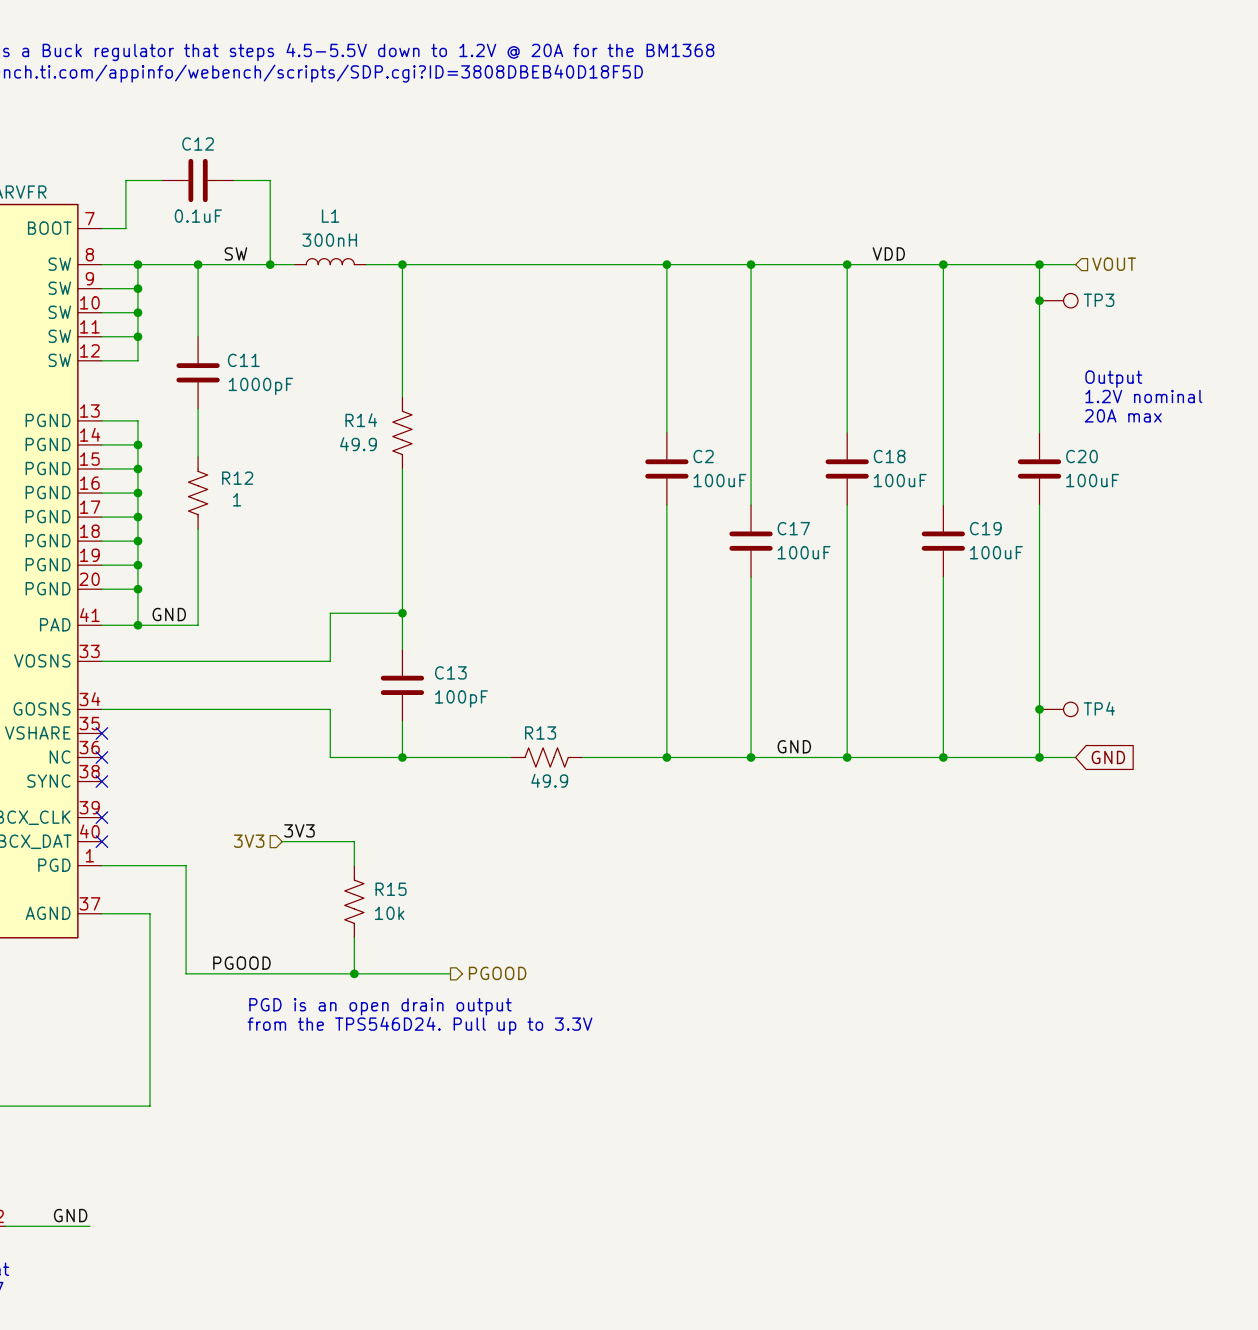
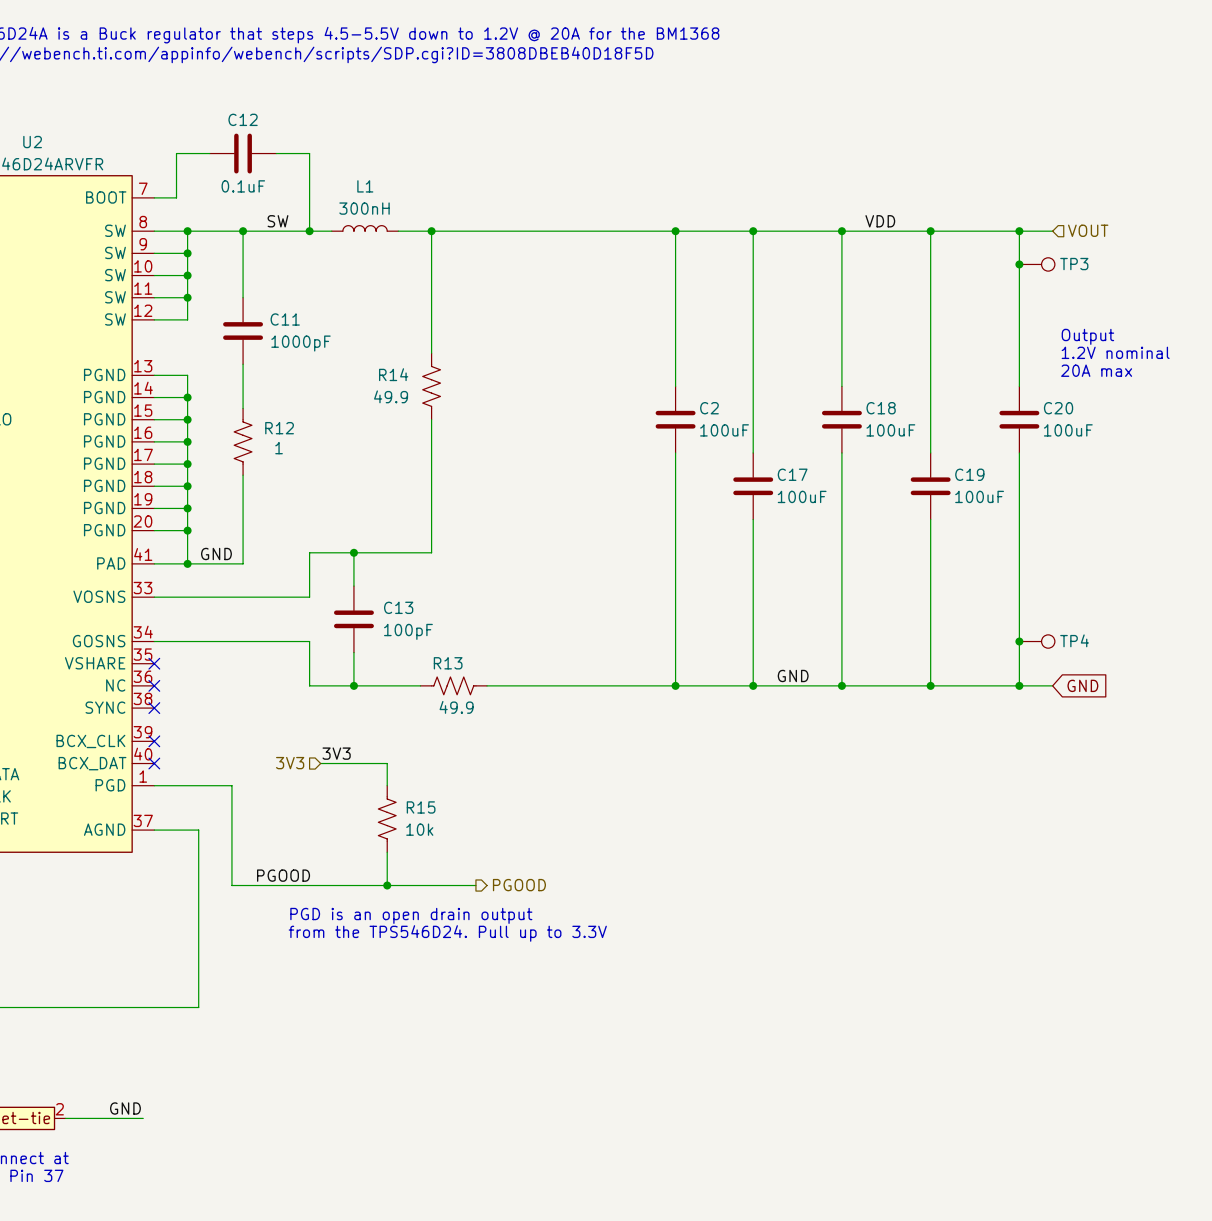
junction: none -> (353, 552)
wire: (330, 613) (330, 661) (270, 661) -> (365, 552) (309, 552) (309, 597)
wire: (402, 613) (402, 649) -> (353, 552) (353, 586)
junction: (402, 613) -> none
C13 position: (402, 685) -> (353, 619)
wire: (270, 709) (330, 709) (330, 757) -> (309, 641) (309, 685) (365, 685)
wire: (402, 721) (402, 757) -> (353, 652) (353, 685)
junction: none -> (353, 685)
junction: (402, 757) -> none
R13 position: (546, 757) -> (453, 685)

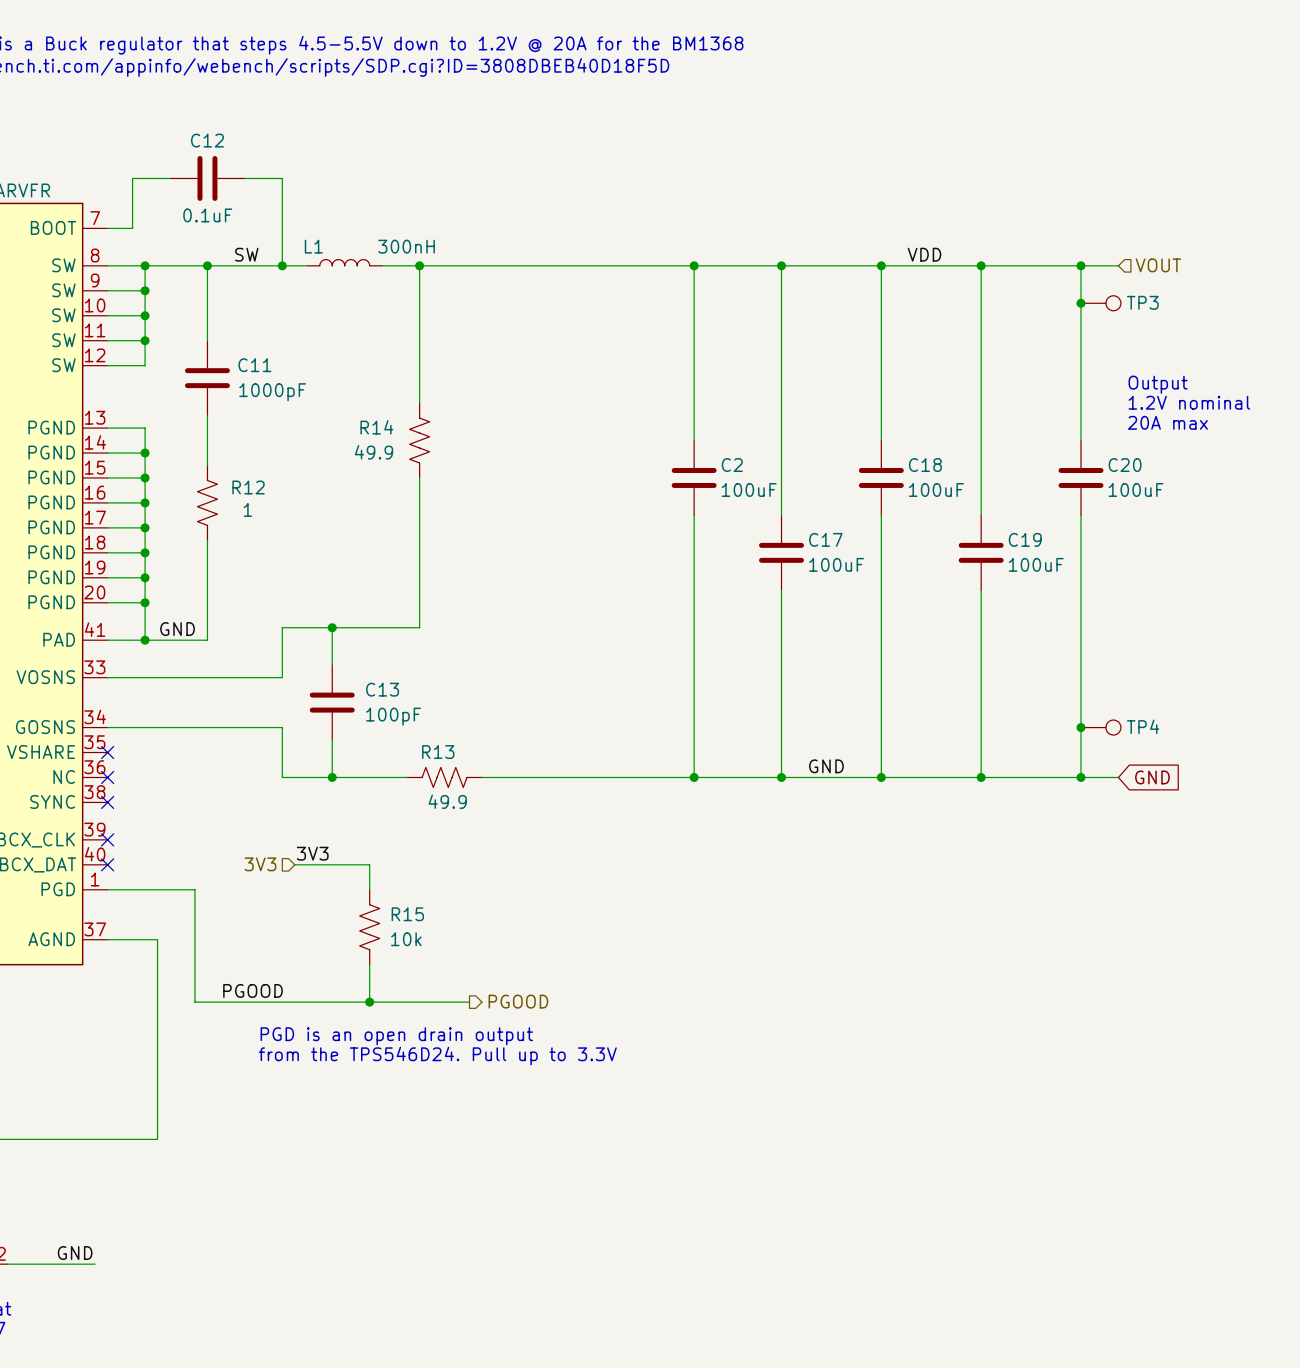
L1 name position: L1 (365, 186) -> L1 (313, 246)
L1 value position: 300nH (364, 208) -> 300nH (406, 246)

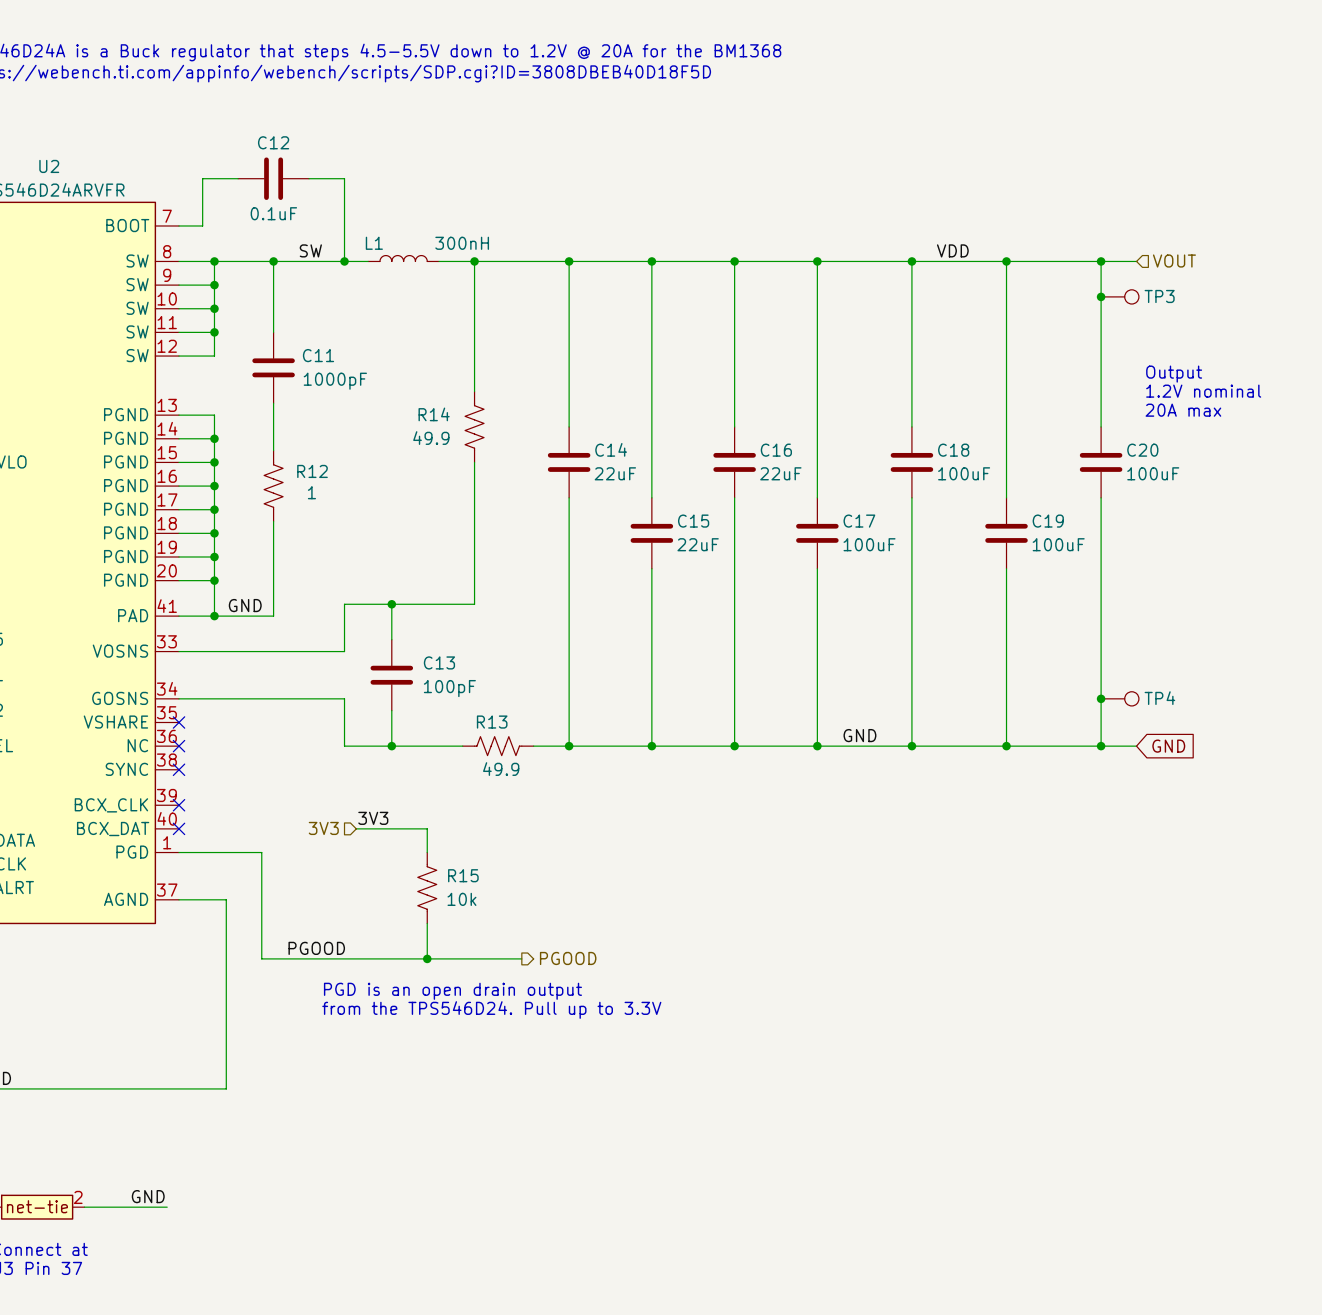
wire: none -> (569, 261) (569, 426)
junction: none -> (569, 261)
wire: none -> (651, 261) (651, 497)
junction: none -> (651, 261)
C2 name: C2 (732, 465) -> C16 (776, 450)
C14: none -> 22uF (569, 462)
C2 value: 100uF (749, 489) -> 22uF (780, 473)
wire: none -> (569, 497) (569, 746)
C15: none -> 22uF (651, 533)
wire: none -> (651, 568) (651, 746)
junction: none -> (569, 746)
junction: none -> (651, 746)

